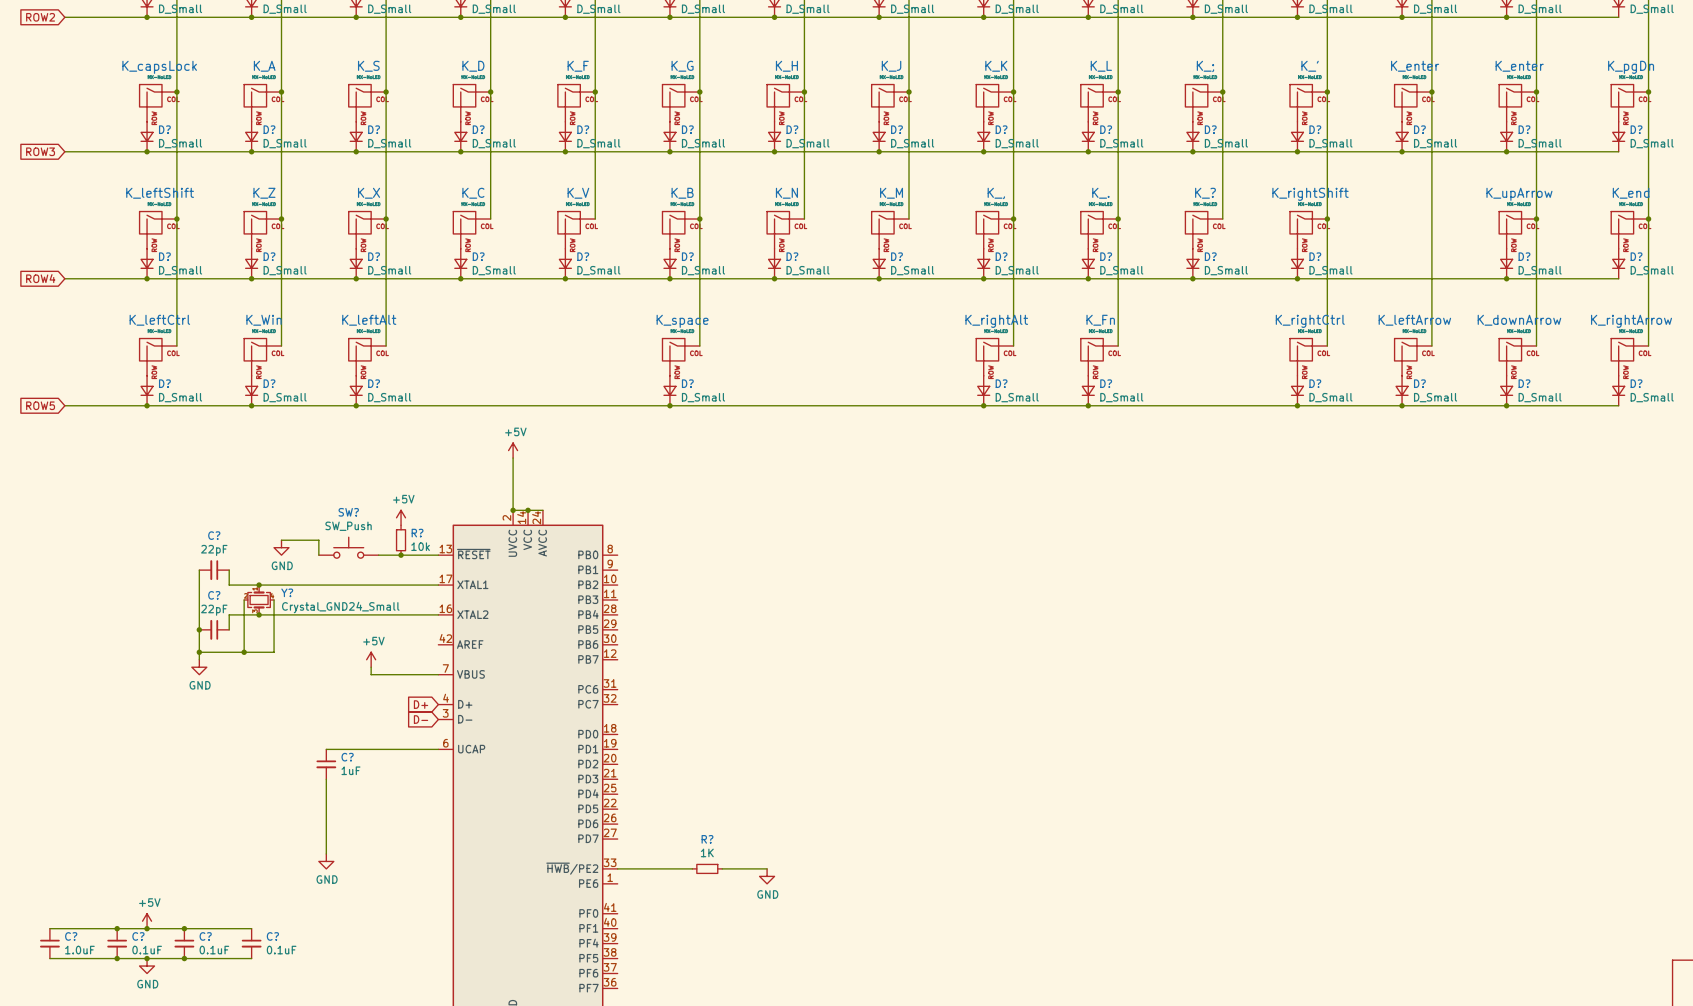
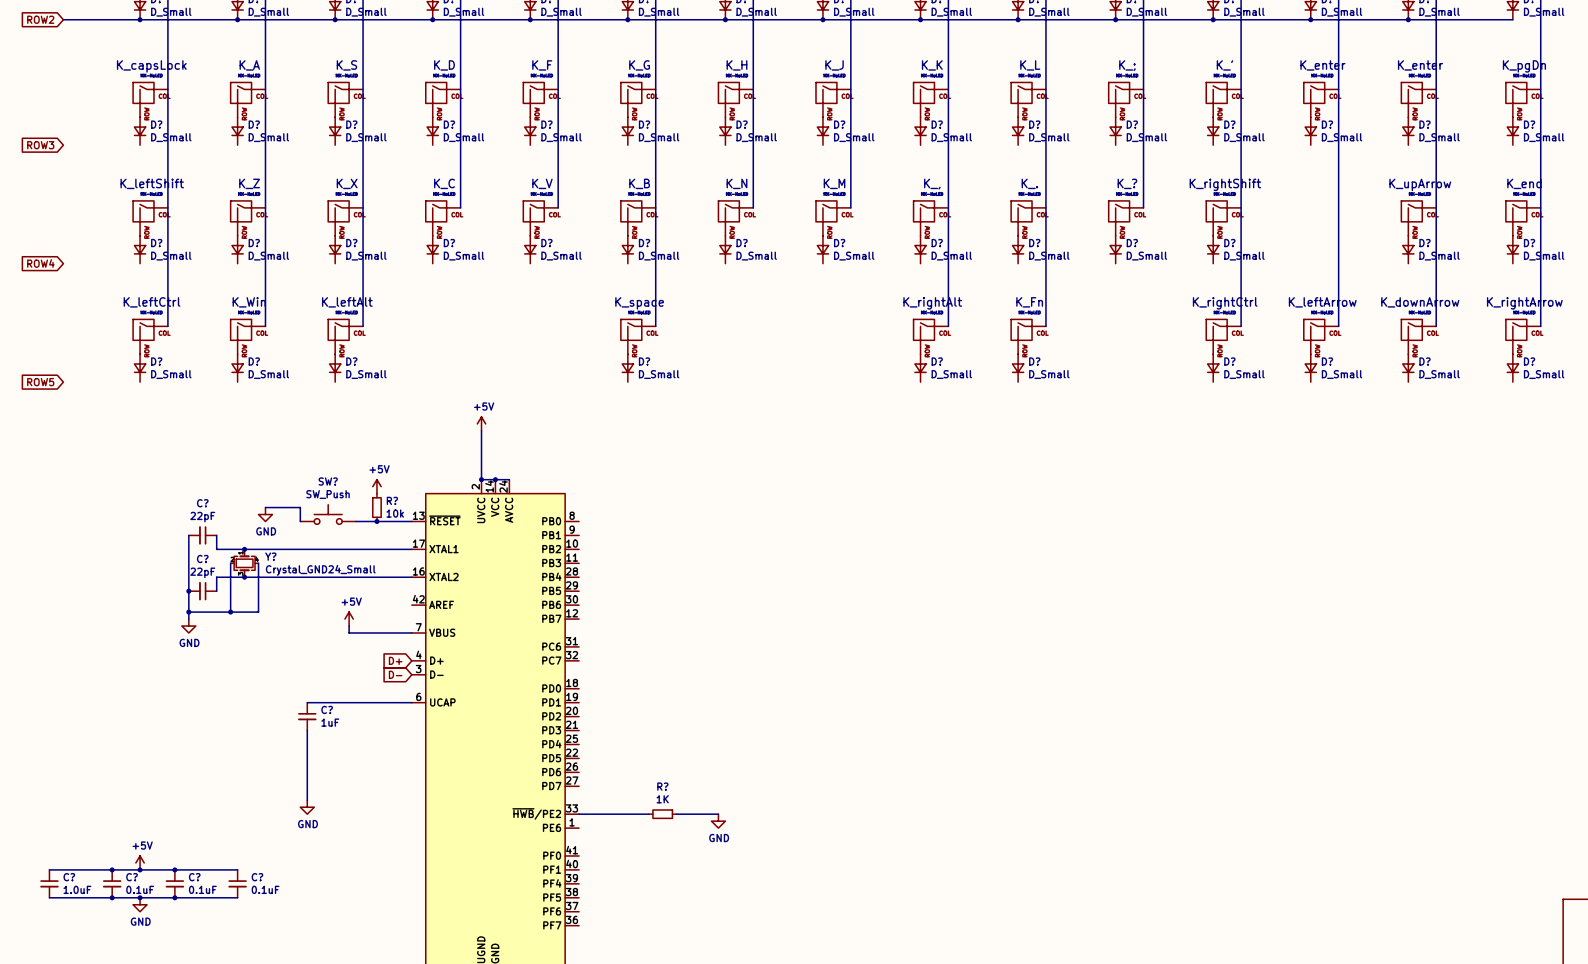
junction: (176, 92) -> none
junction: (281, 92) -> none
junction: (386, 92) -> none
junction: (490, 92) -> none
junction: (595, 92) -> none
junction: (699, 92) -> none
junction: (804, 92) -> none
junction: (909, 92) -> none
junction: (1013, 92) -> none
junction: (1118, 92) -> none
junction: (1222, 92) -> none
junction: (1327, 92) -> none
junction: (1431, 92) -> none
junction: (1536, 92) -> none
junction: (1648, 92) -> none
wire: (64, 151) (1618, 151) -> none
junction: (147, 151) -> none
junction: (251, 151) -> none
junction: (356, 151) -> none
junction: (460, 151) -> none
junction: (565, 151) -> none
junction: (669, 151) -> none
junction: (774, 151) -> none
junction: (879, 151) -> none
junction: (983, 151) -> none
junction: (1088, 151) -> none
junction: (1192, 151) -> none
junction: (1297, 151) -> none
junction: (1402, 151) -> none
junction: (1506, 151) -> none
junction: (176, 219) -> none
junction: (281, 219) -> none
junction: (386, 219) -> none
junction: (699, 219) -> none
junction: (1013, 219) -> none
junction: (1118, 219) -> none
junction: (1327, 219) -> none
junction: (1536, 219) -> none
junction: (1648, 219) -> none
wire: (64, 278) (1618, 278) -> none
junction: (147, 278) -> none
junction: (251, 278) -> none
junction: (356, 278) -> none
junction: (460, 278) -> none
junction: (565, 278) -> none
junction: (669, 278) -> none
junction: (774, 278) -> none
junction: (879, 278) -> none
junction: (983, 278) -> none
junction: (1088, 278) -> none
junction: (1192, 278) -> none
junction: (1297, 278) -> none
junction: (1506, 278) -> none
wire: (64, 405) (1618, 405) -> none
junction: (147, 405) -> none
junction: (251, 405) -> none
junction: (356, 405) -> none
junction: (669, 405) -> none
junction: (983, 405) -> none
junction: (1088, 405) -> none
junction: (1297, 405) -> none
junction: (1402, 405) -> none
junction: (1506, 405) -> none

